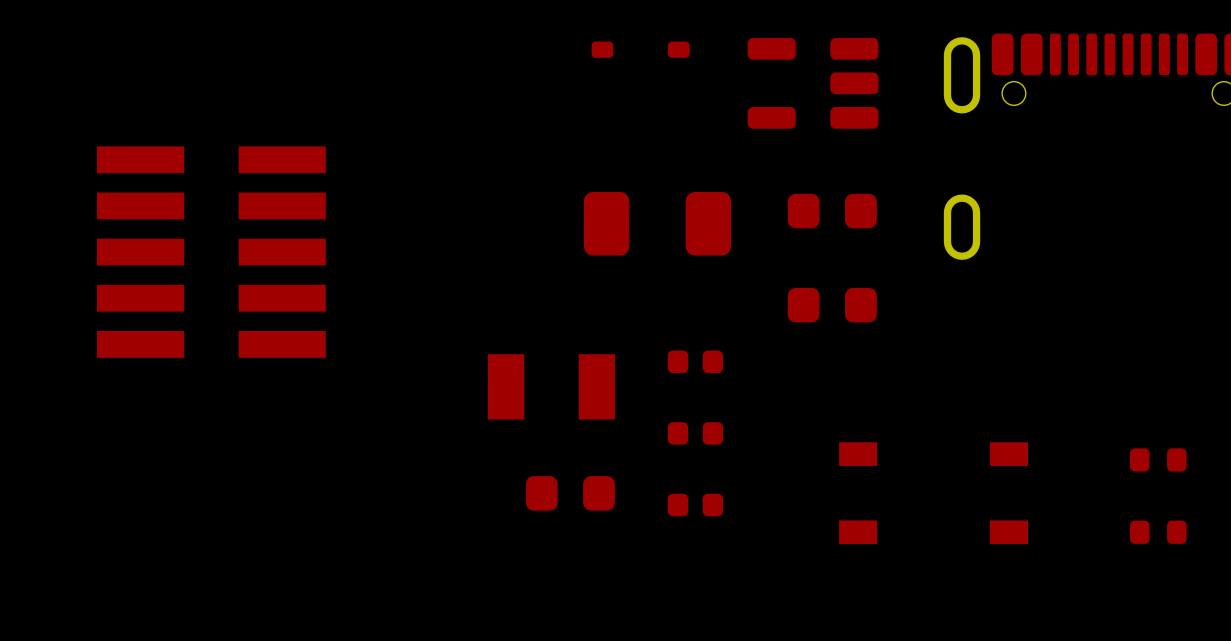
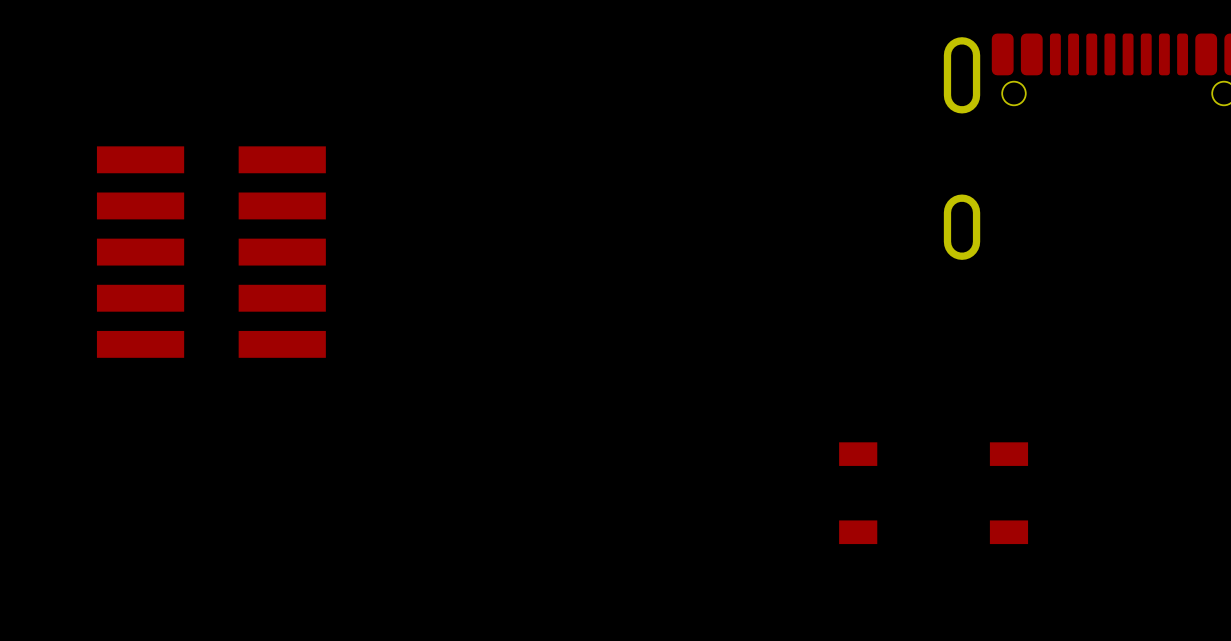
part: (640, 49) -> none
part: (813, 83) -> none
part: (832, 211) -> none
part: (657, 223) -> none
part: (832, 305) -> none
part: (695, 361) -> none
part: (551, 386) -> none
part: (695, 433) -> none
part: (1158, 459) -> none
part: (570, 493) -> none
part: (695, 504) -> none
part: (1158, 532) -> none

